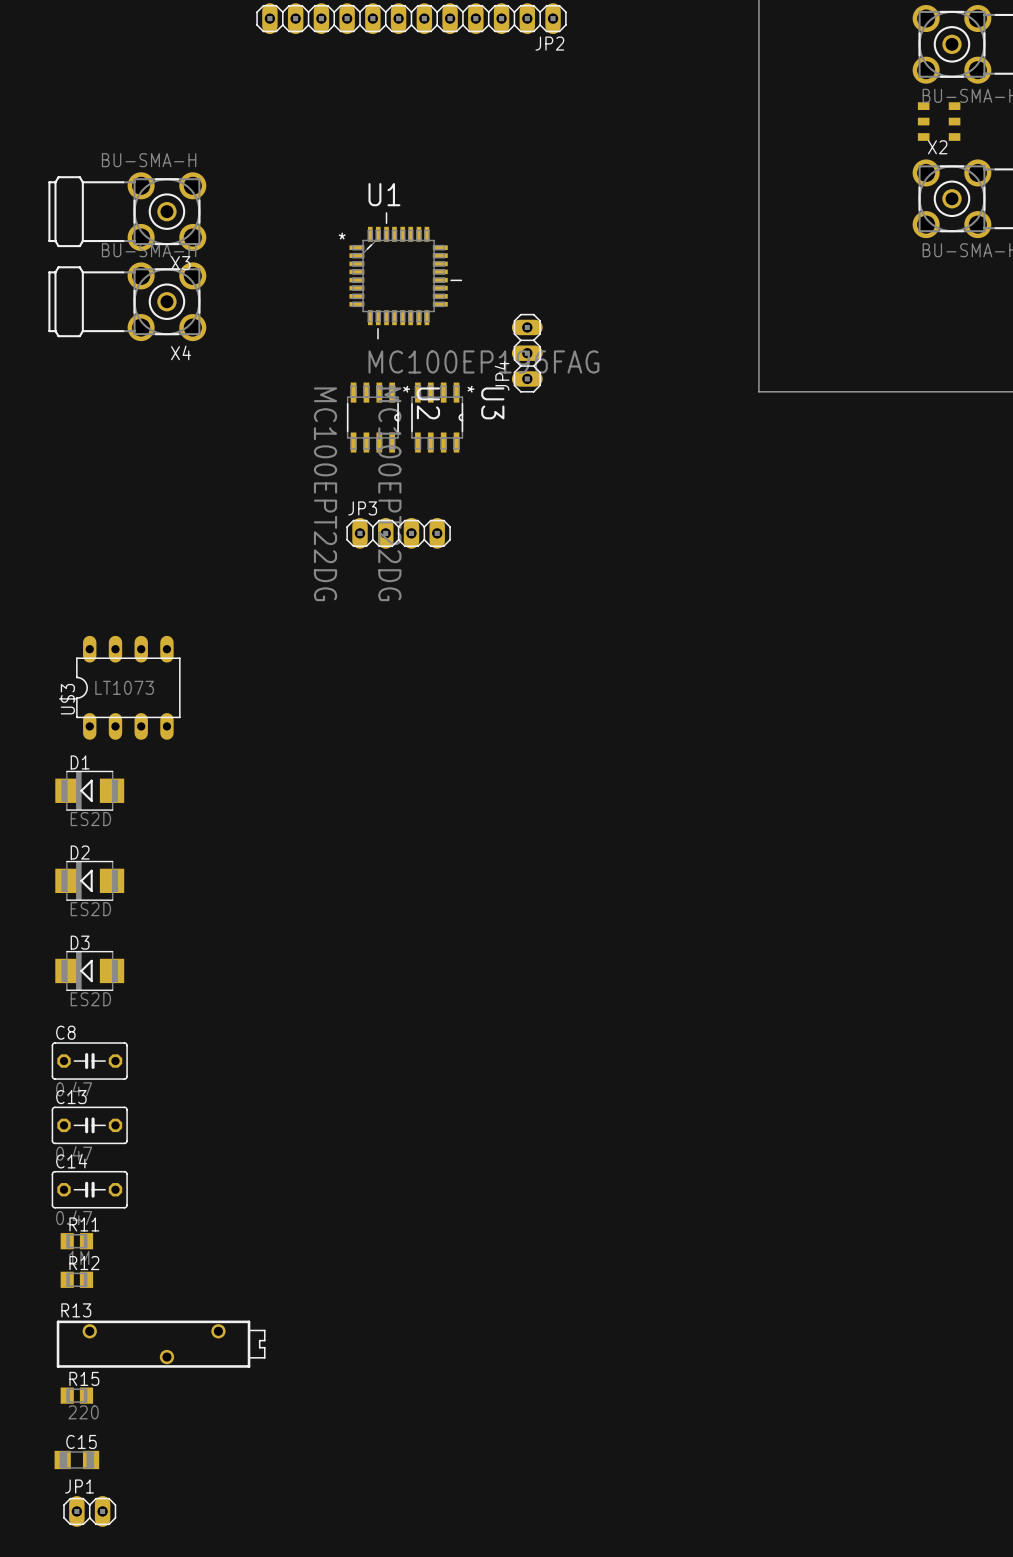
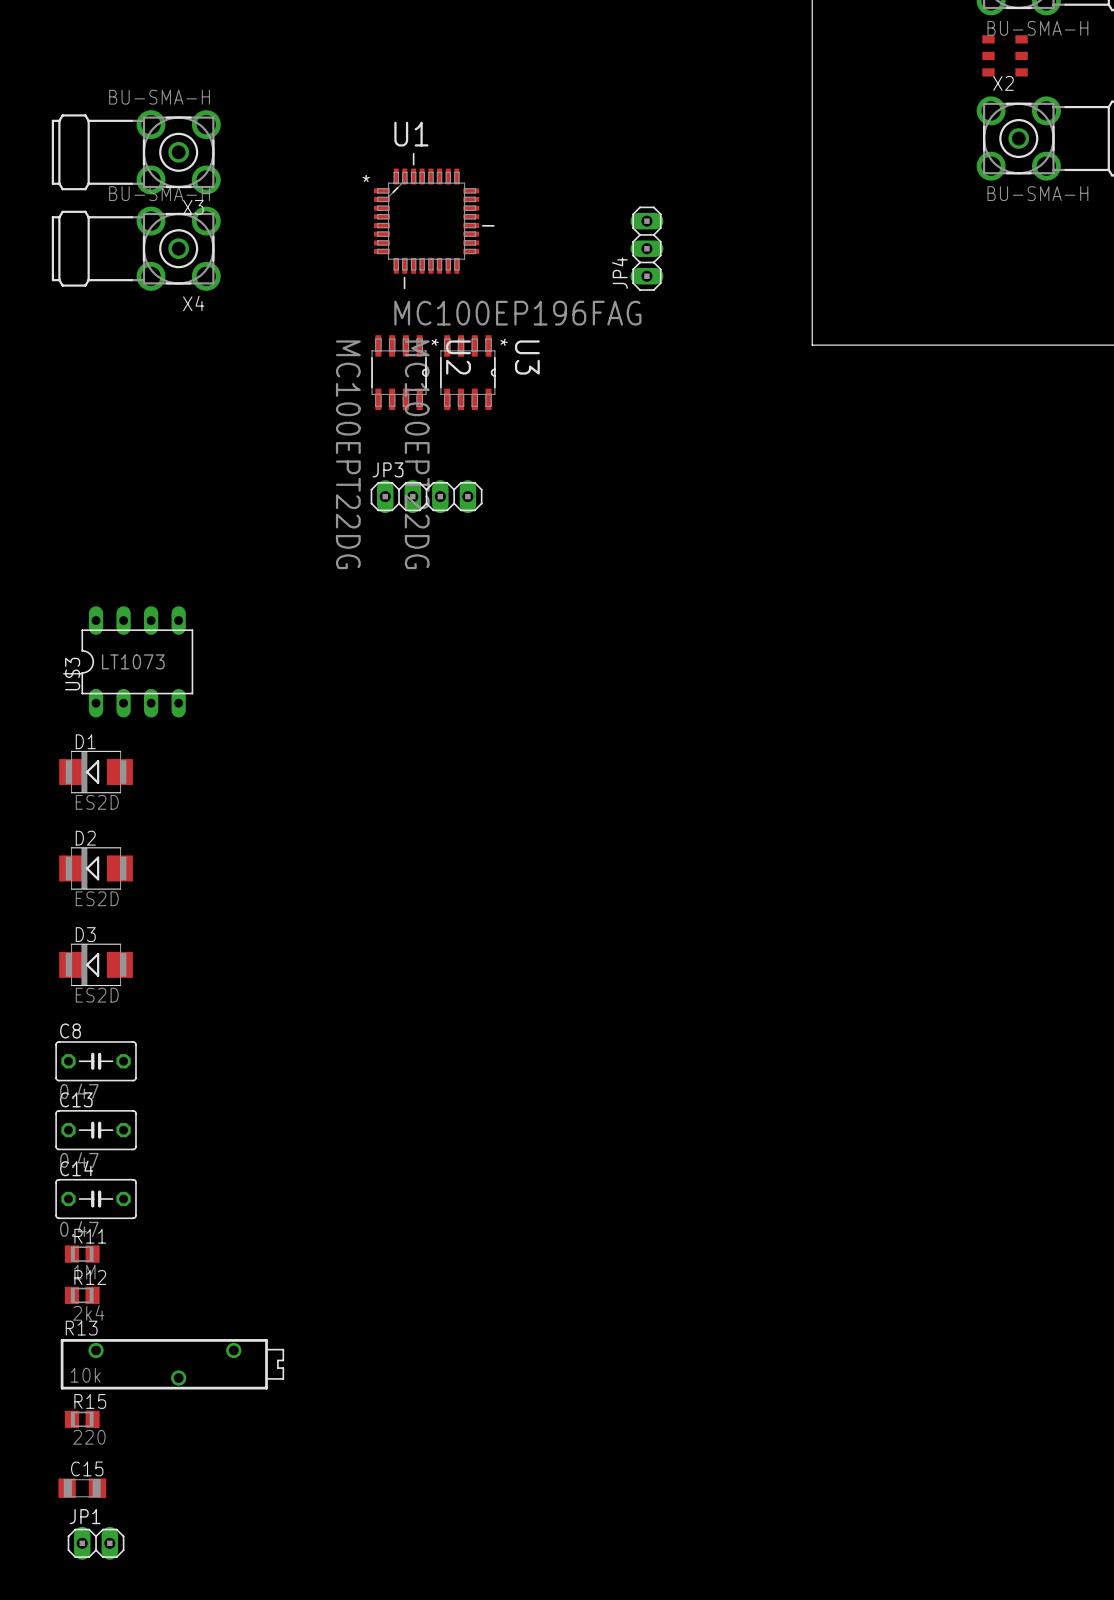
JP4 position: (527, 353) -> (646, 248)
R12 value: none -> 2k4 (88, 1312)
R13 value: none -> 10k (85, 1375)

